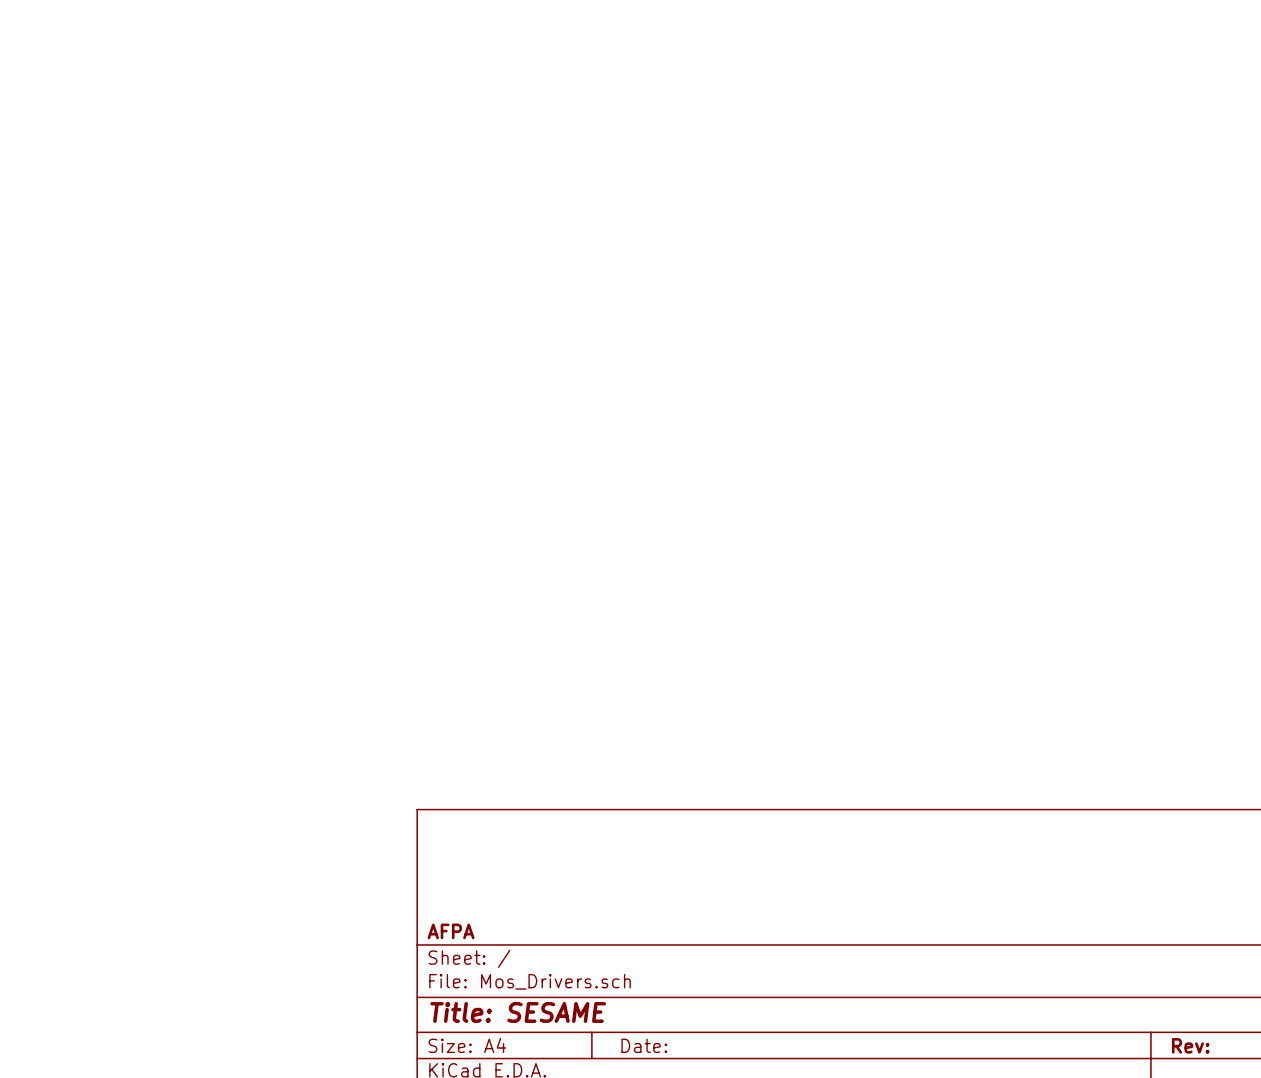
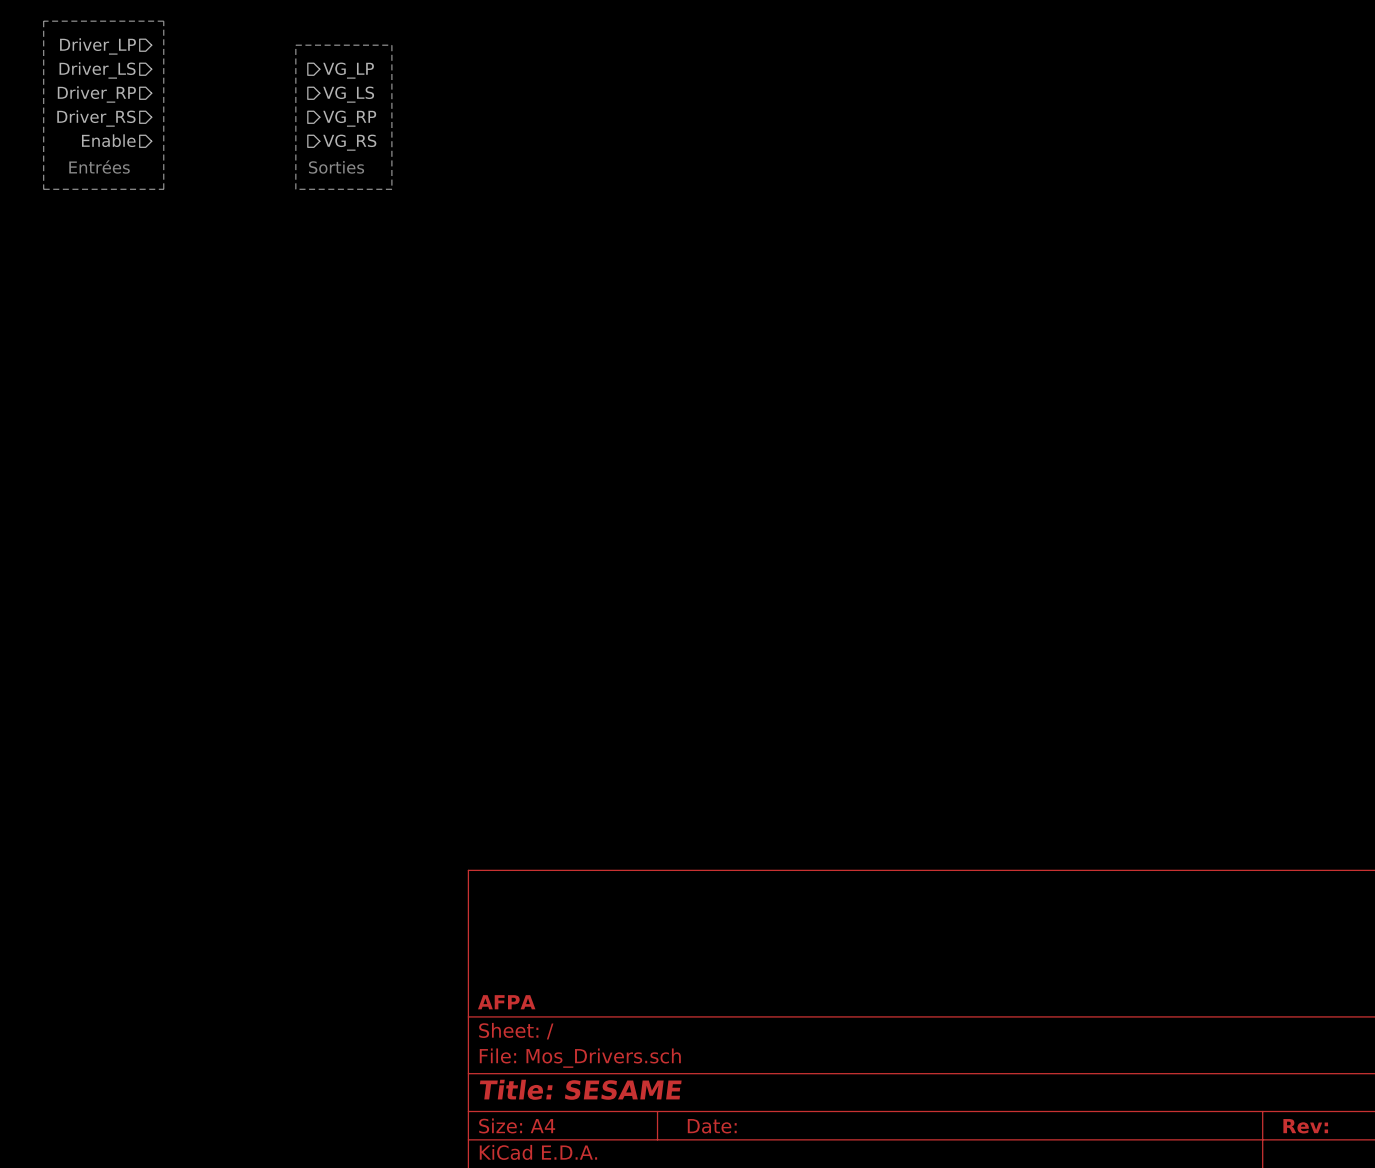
line: none -> (43, 21) (163, 21) (163, 189) (43, 189) (43, 21)
hierarchical label: none -> Driver_LP (97, 46)
line: none -> (295, 45) (391, 45) (391, 189) (295, 189) (295, 45)
hierarchical label: none -> Driver_LS (97, 70)
hierarchical label: none -> VG_LP (348, 70)
hierarchical label: none -> Driver_RP (96, 94)
hierarchical label: none -> VG_LS (348, 94)
hierarchical label: none -> Driver_RS (96, 118)
hierarchical label: none -> VG_RP (349, 118)
hierarchical label: none -> Enable (108, 140)
hierarchical label: none -> VG_RS (349, 142)
text: none -> Entrées (99, 167)
text: none -> Sorties (336, 167)

